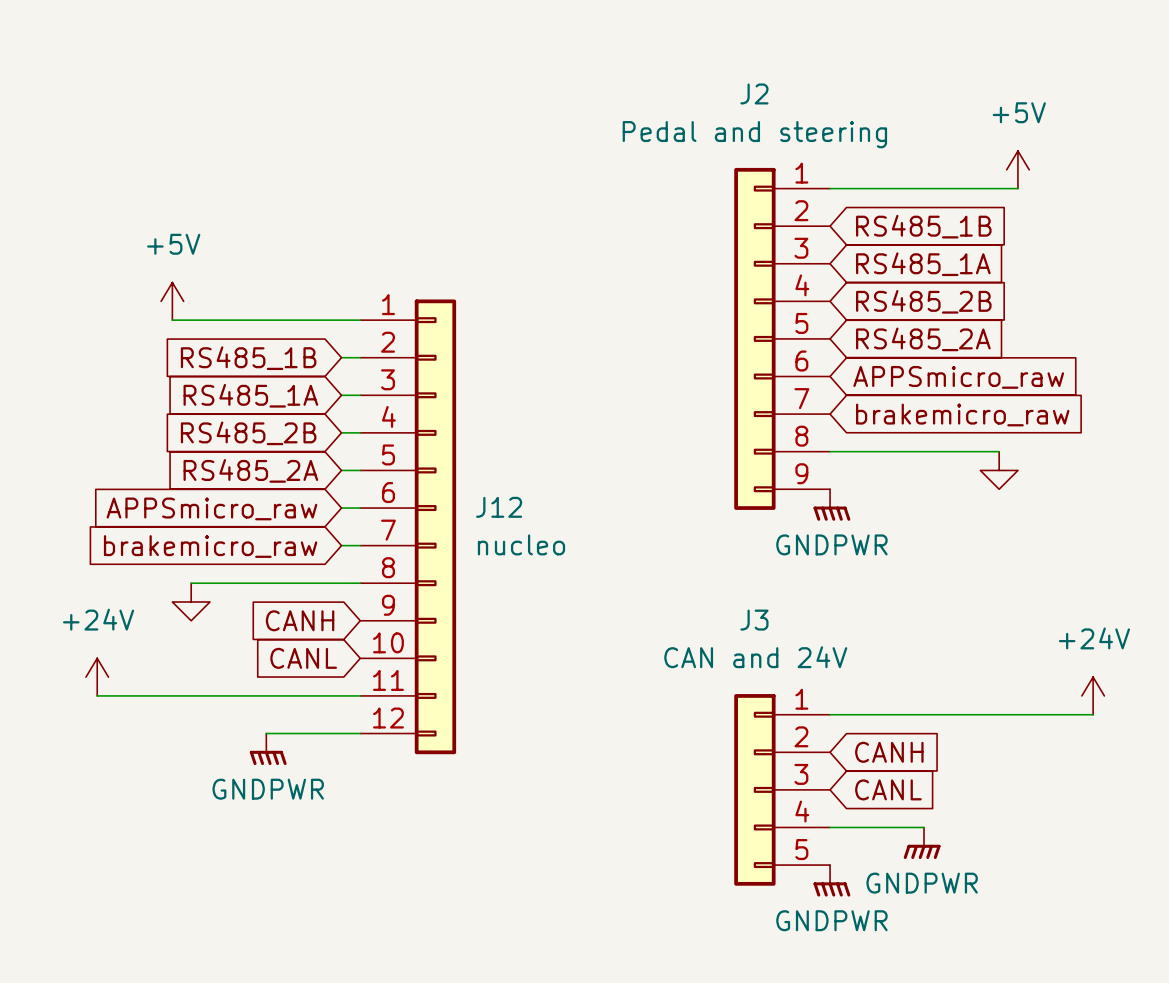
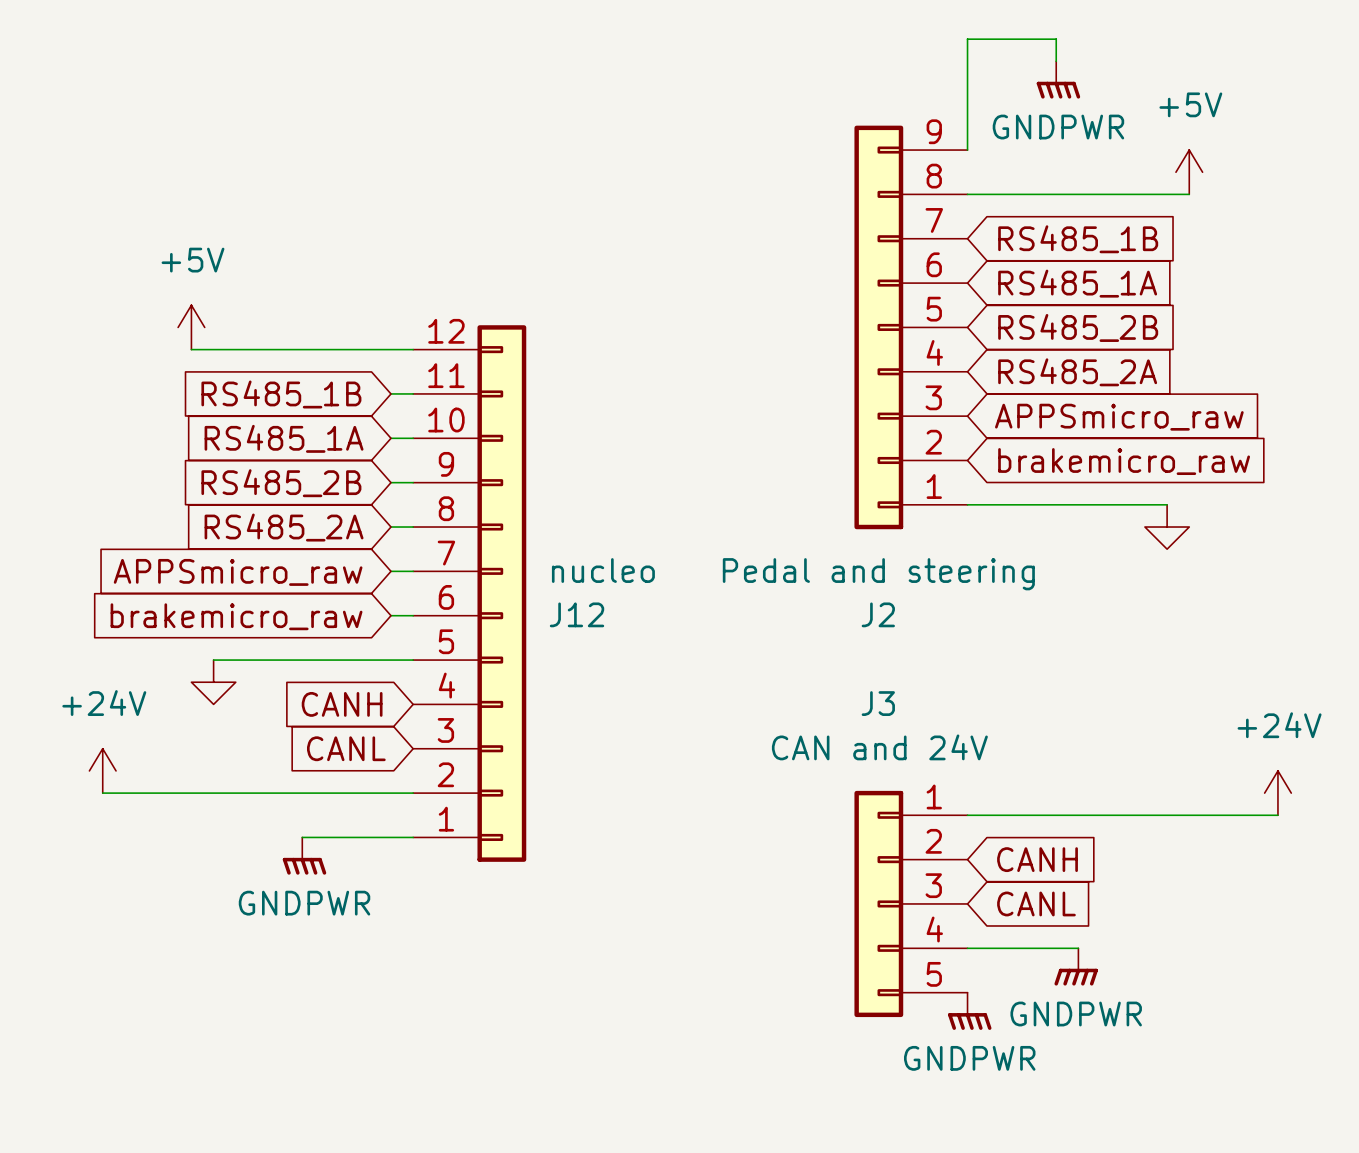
wire: none -> (1056, 61) (1056, 39) (967, 39) (967, 150)
power symbol: none -> GNDPWR (1058, 79)
J2 flip: as is (754, 338) -> up-down (878, 327)
power symbol: GNDPWR (831, 505) -> none
J12 flip: as is (435, 526) -> up-down (501, 593)

